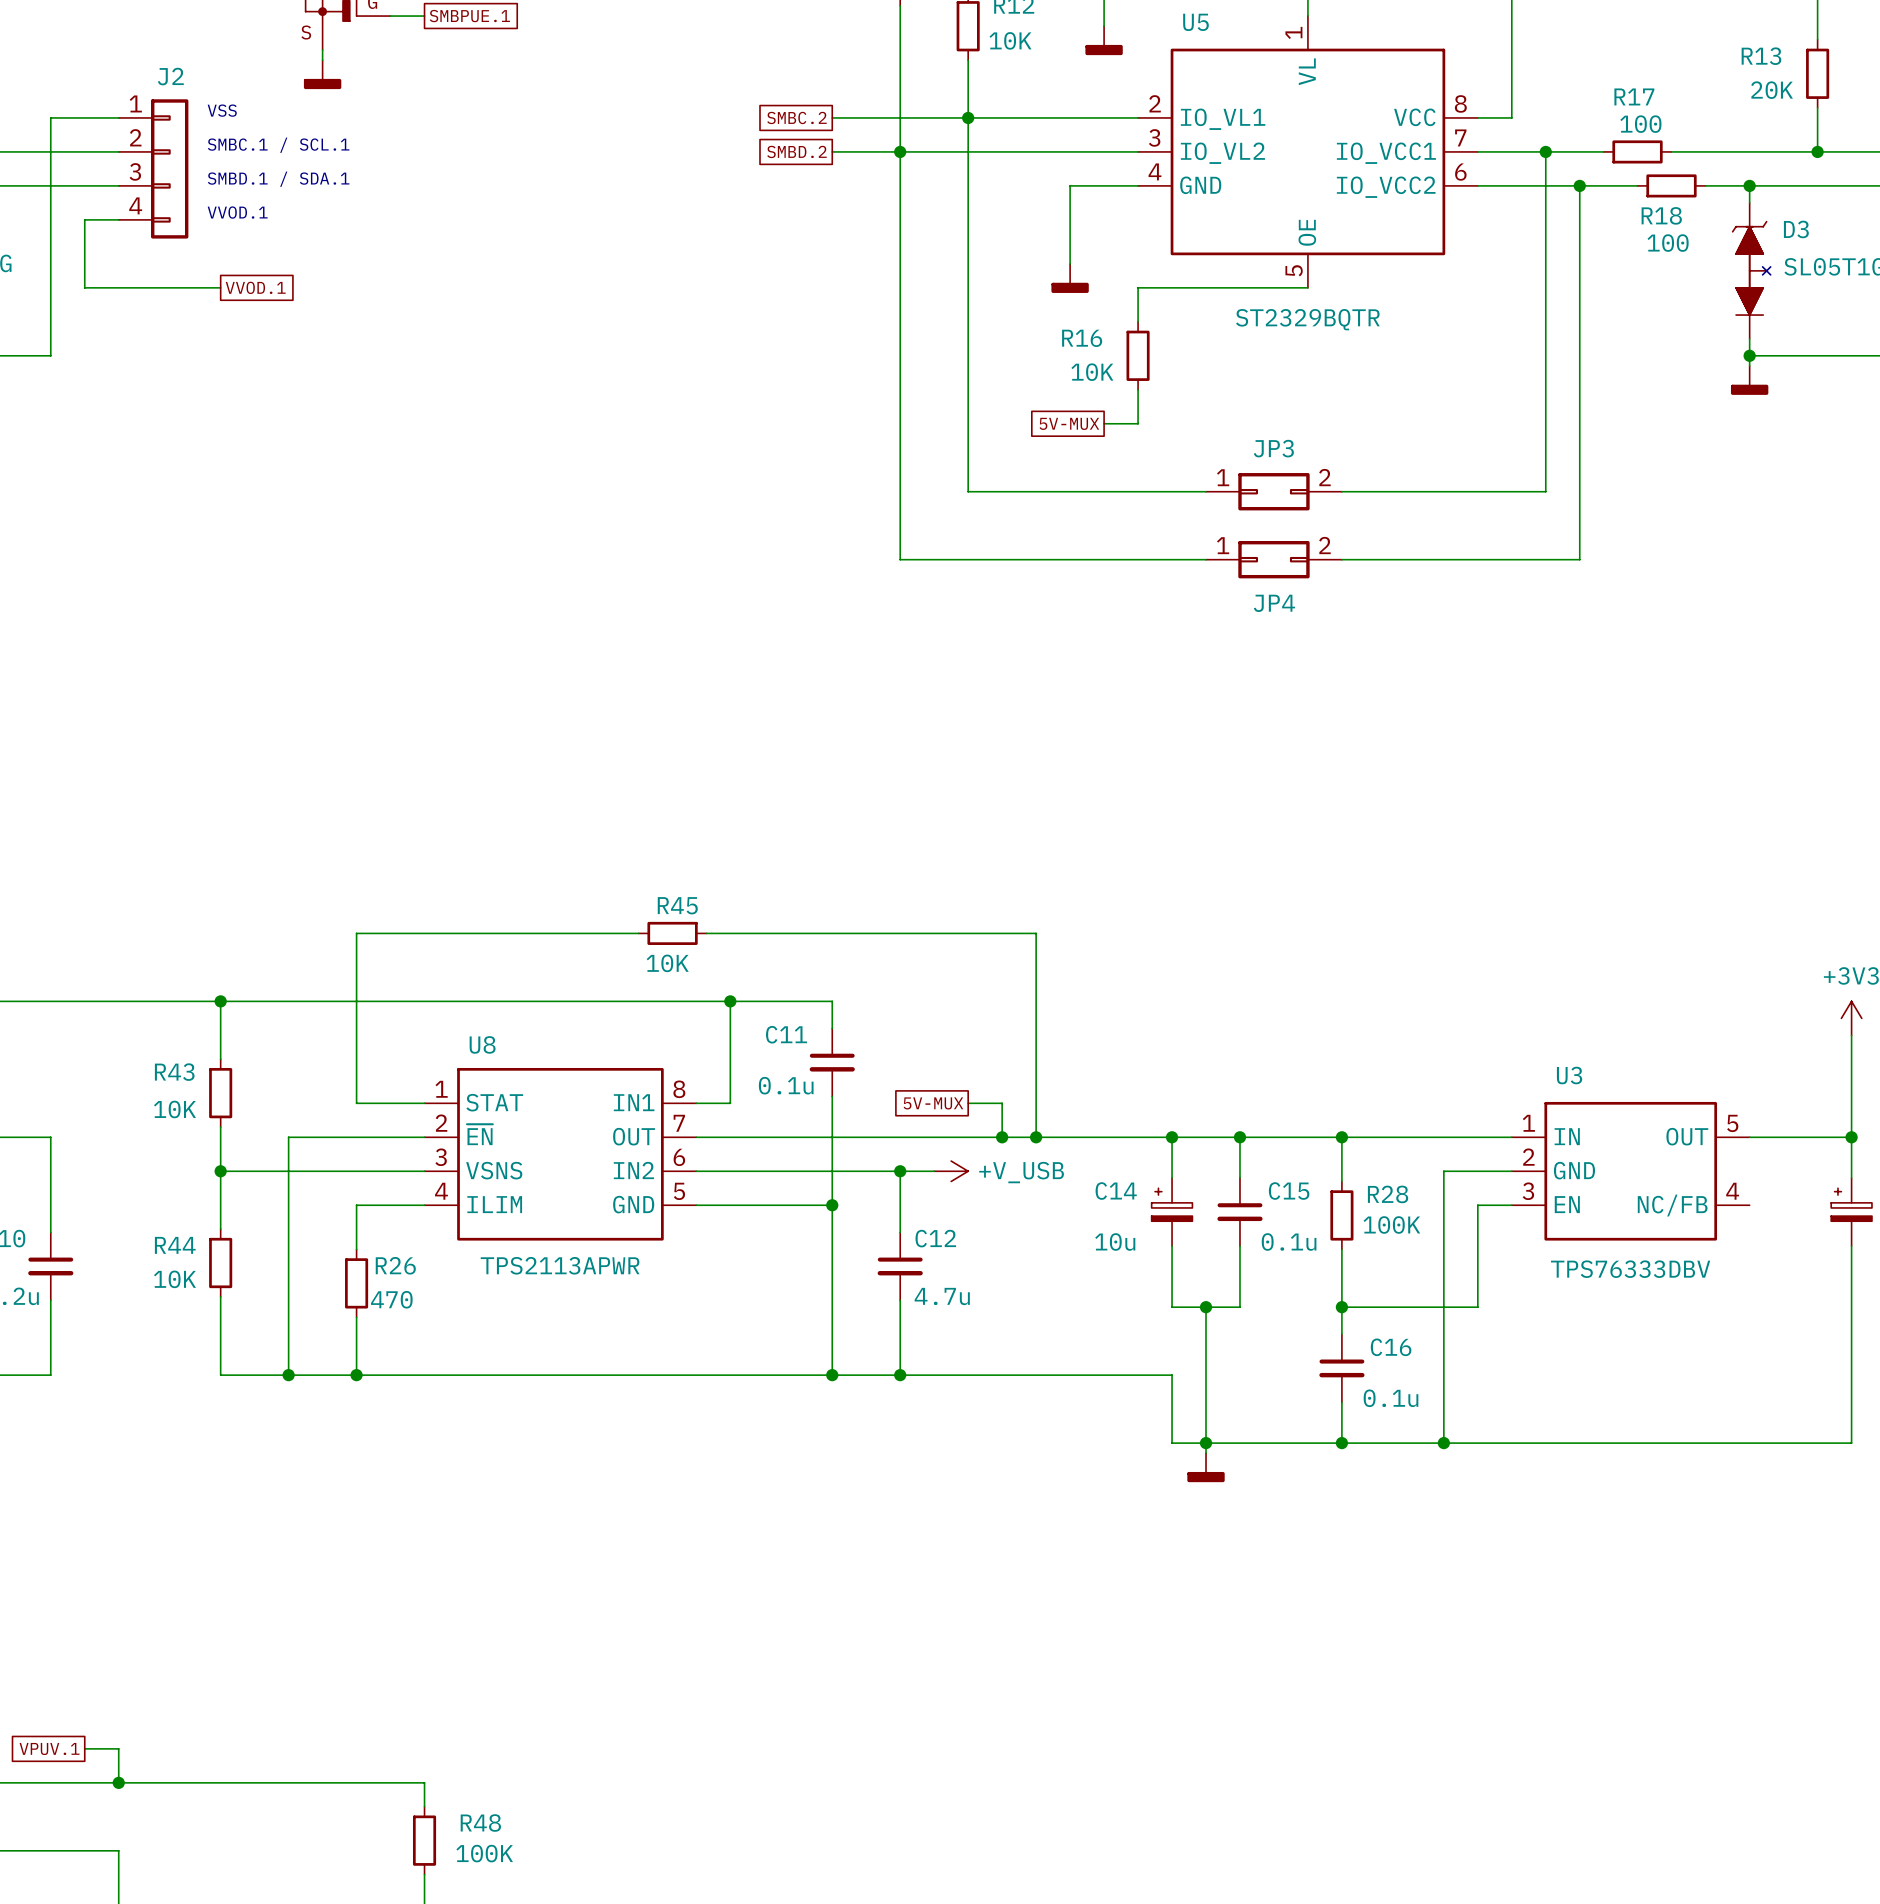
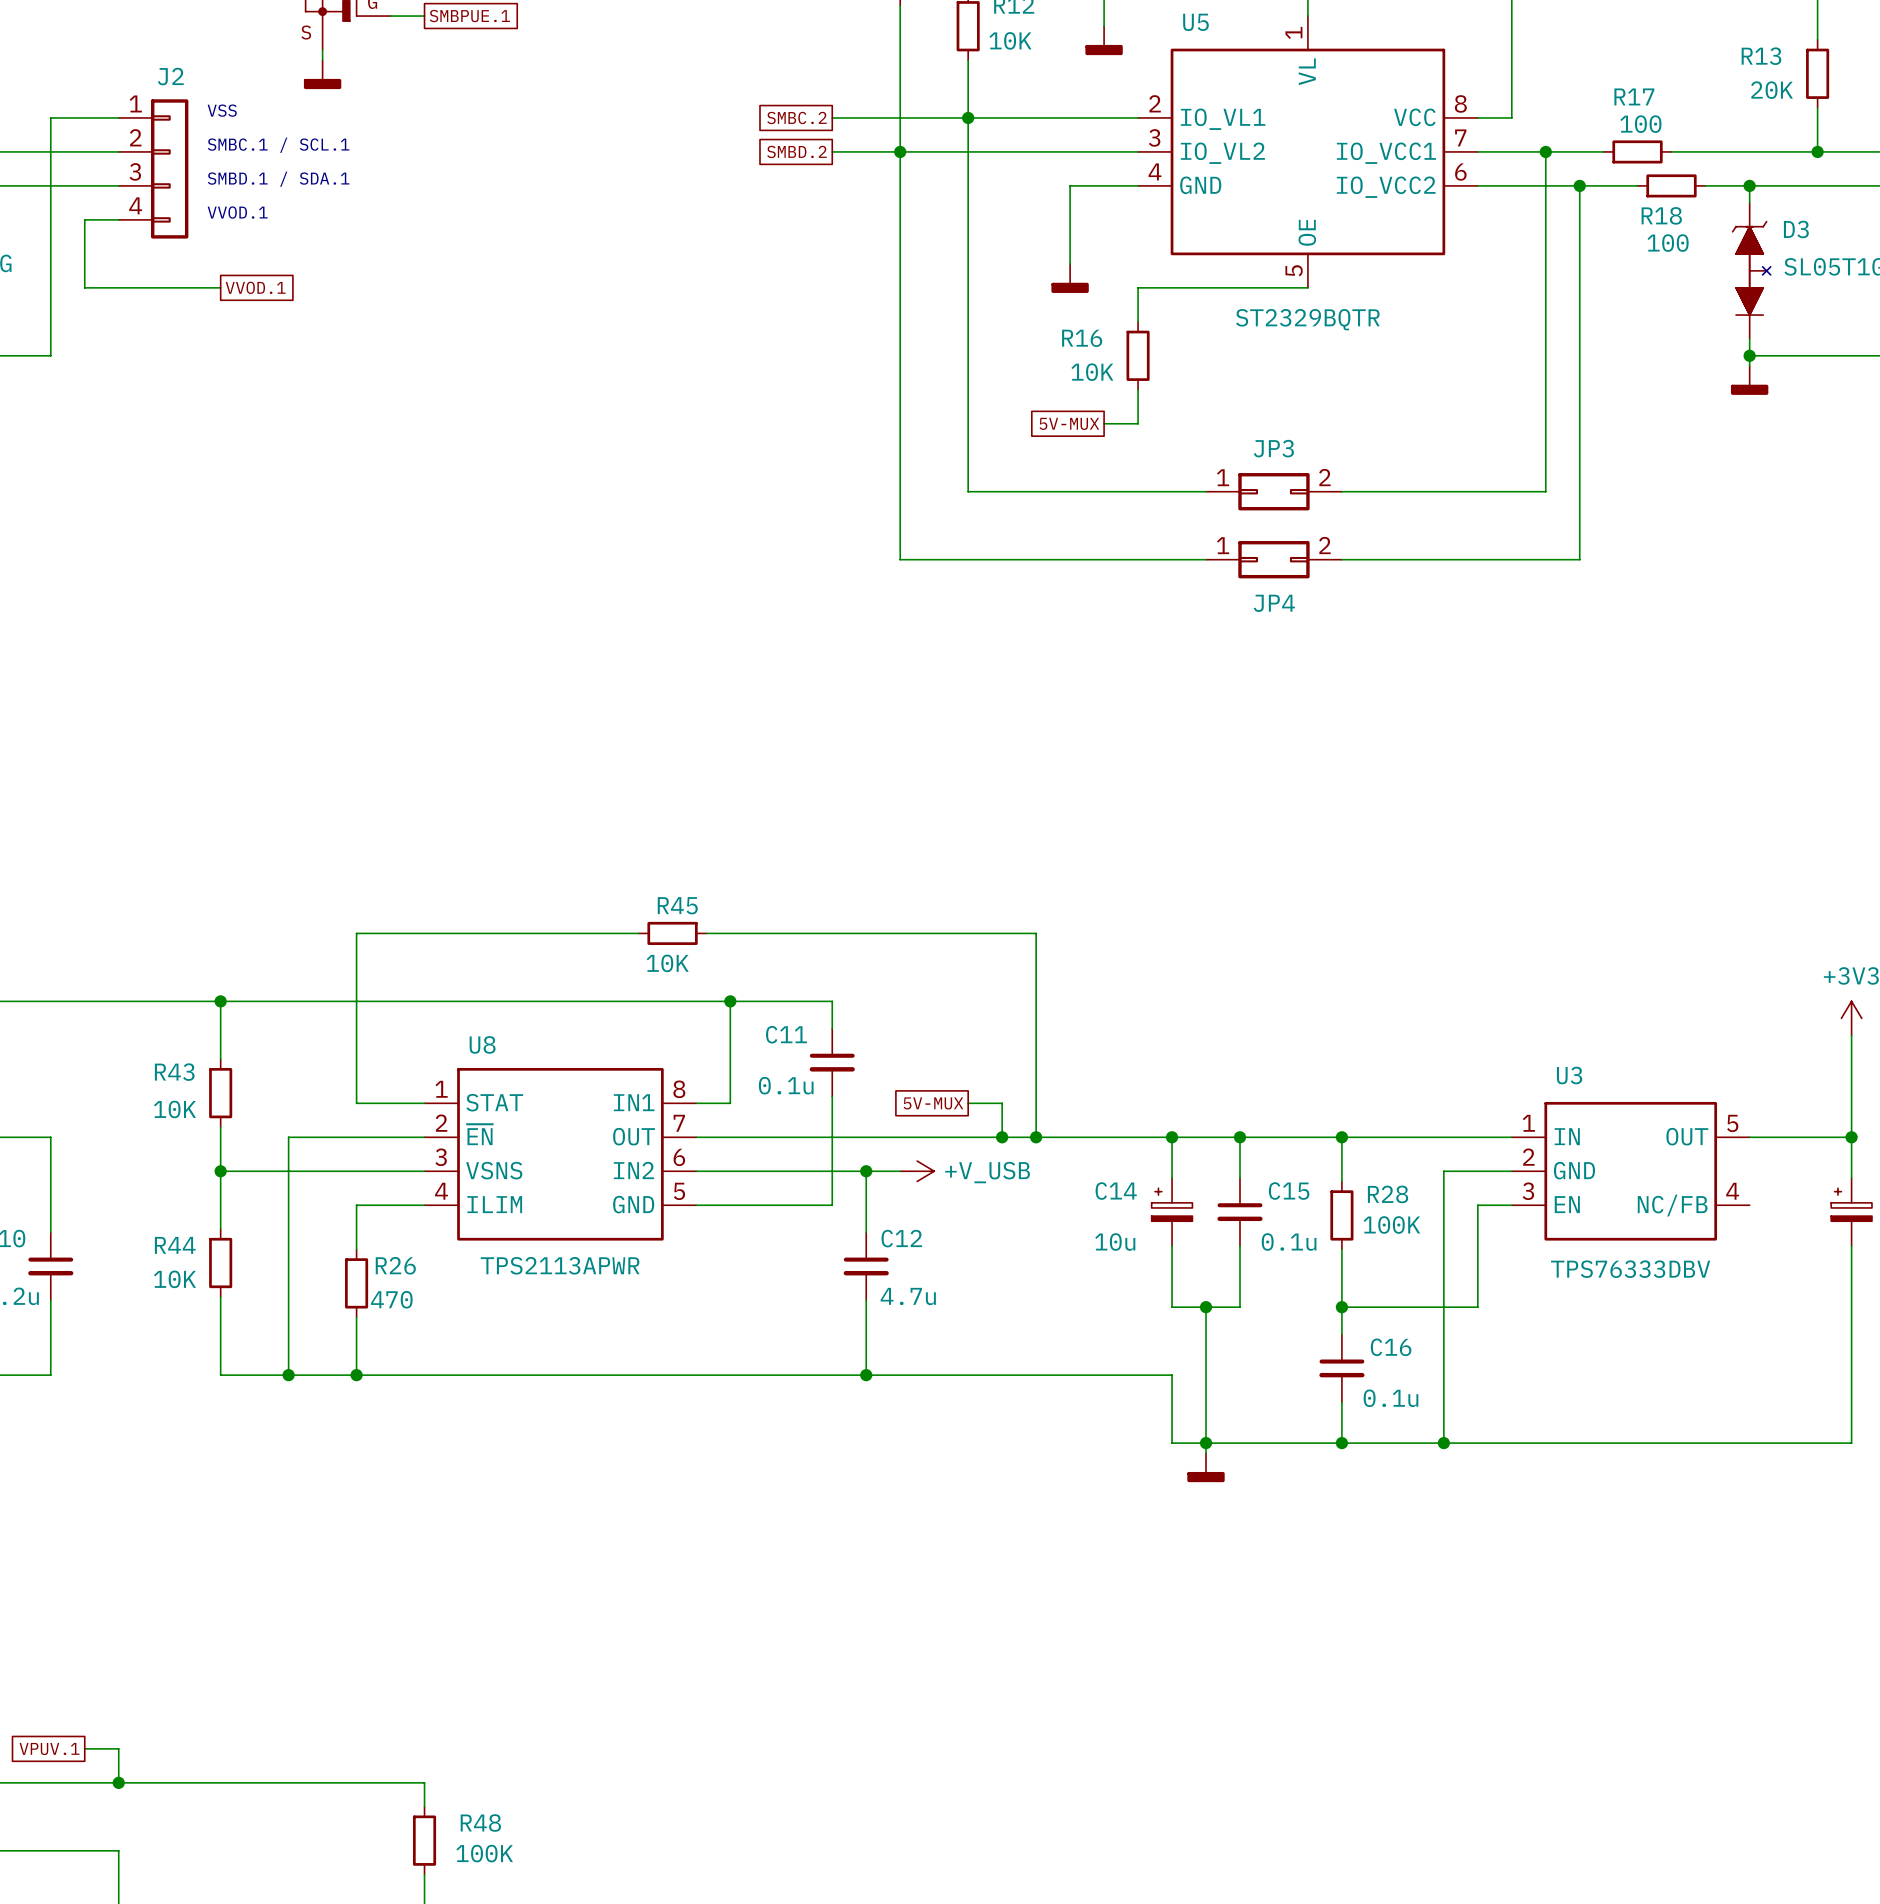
wire: none -> (866, 1171) (866, 1232)
junction: none -> (866, 1171)
junction: (900, 1171) -> none
wire: (934, 1171) (900, 1171) (900, 1232) -> none
power symbol position: +V_USB (951, 1171) -> +V_USB (917, 1171)
wire: (832, 1205) (832, 1375) -> none
junction: (832, 1205) -> none
C12 position: (900, 1266) -> (866, 1266)
wire: (900, 1300) (900, 1375) -> (866, 1300) (866, 1375)
junction: (832, 1375) -> none
junction: none -> (866, 1375)
junction: (900, 1375) -> none

